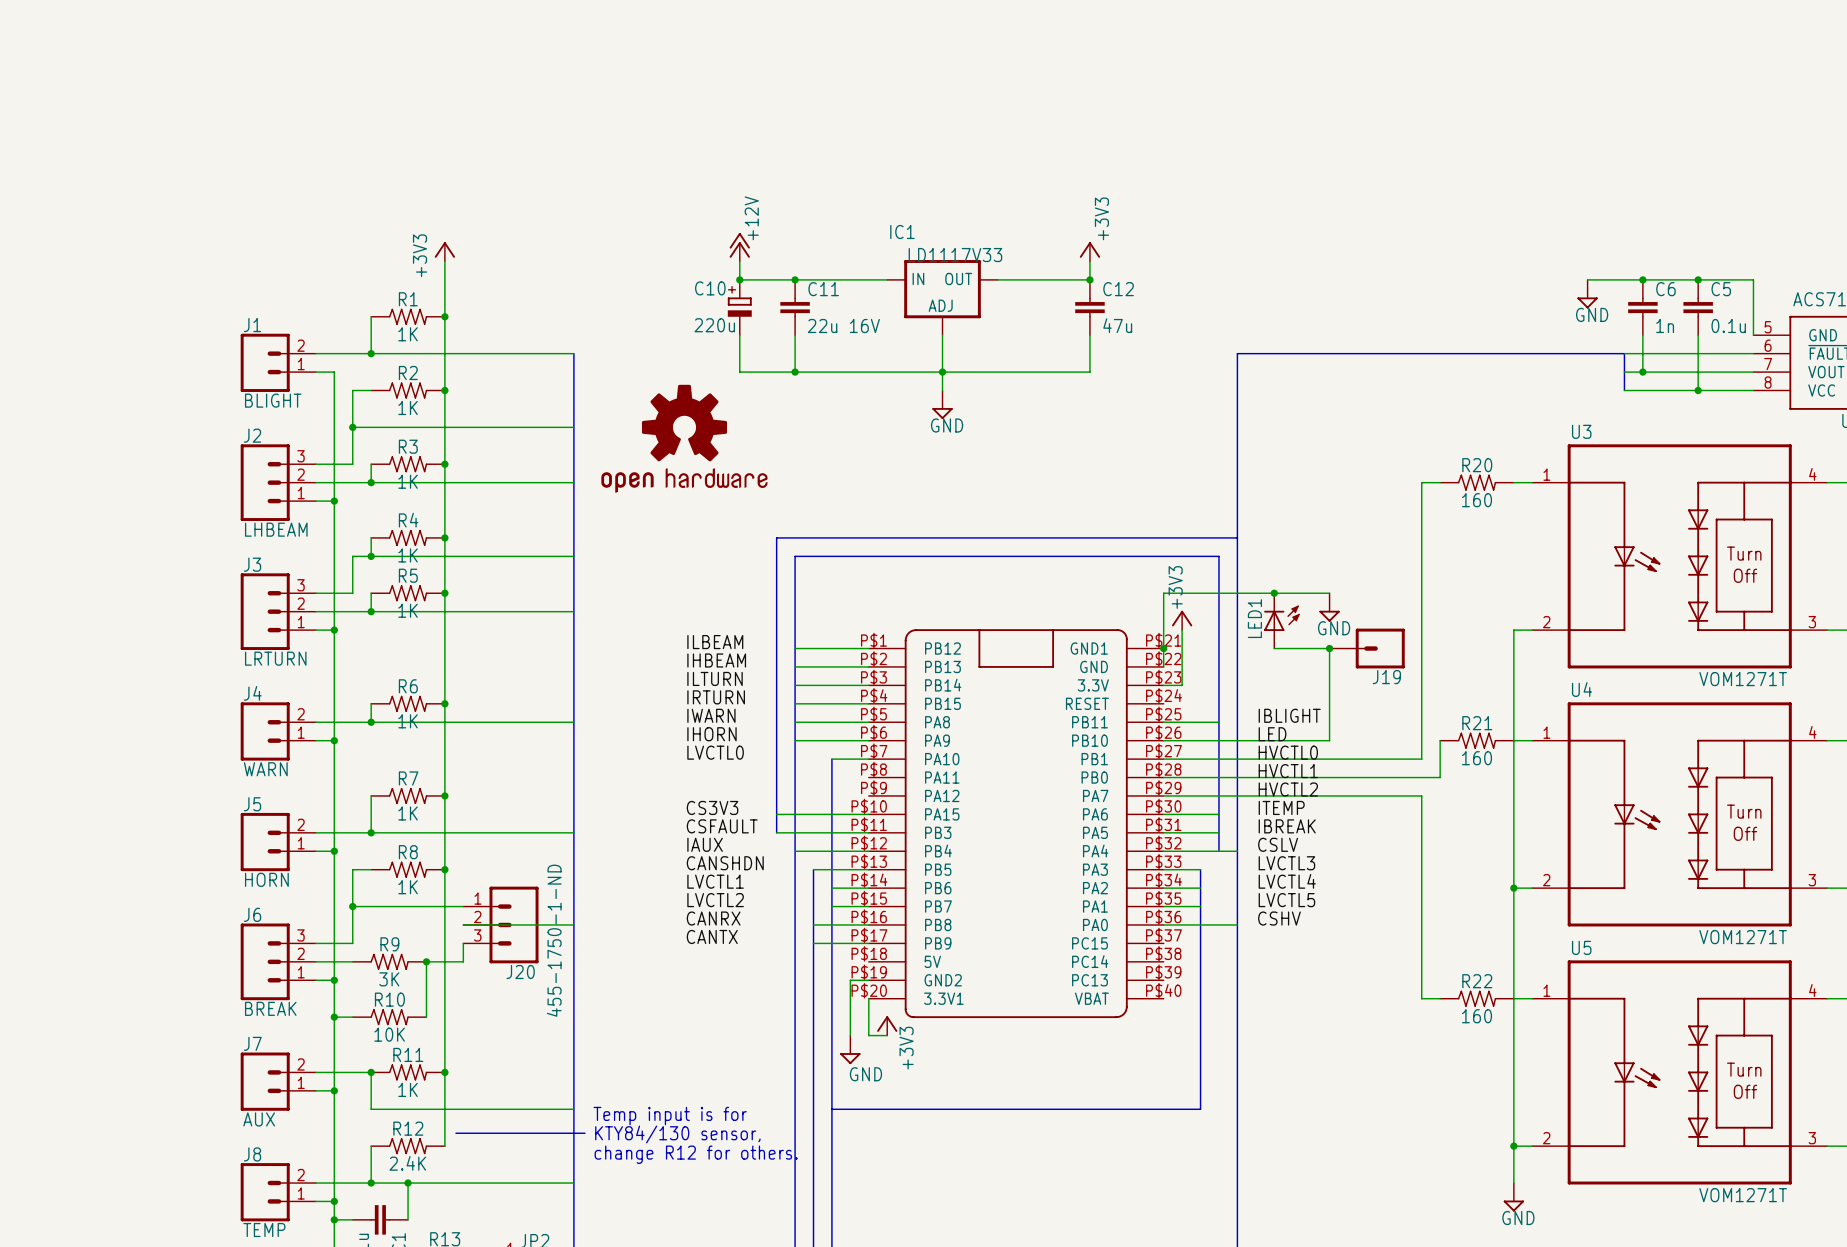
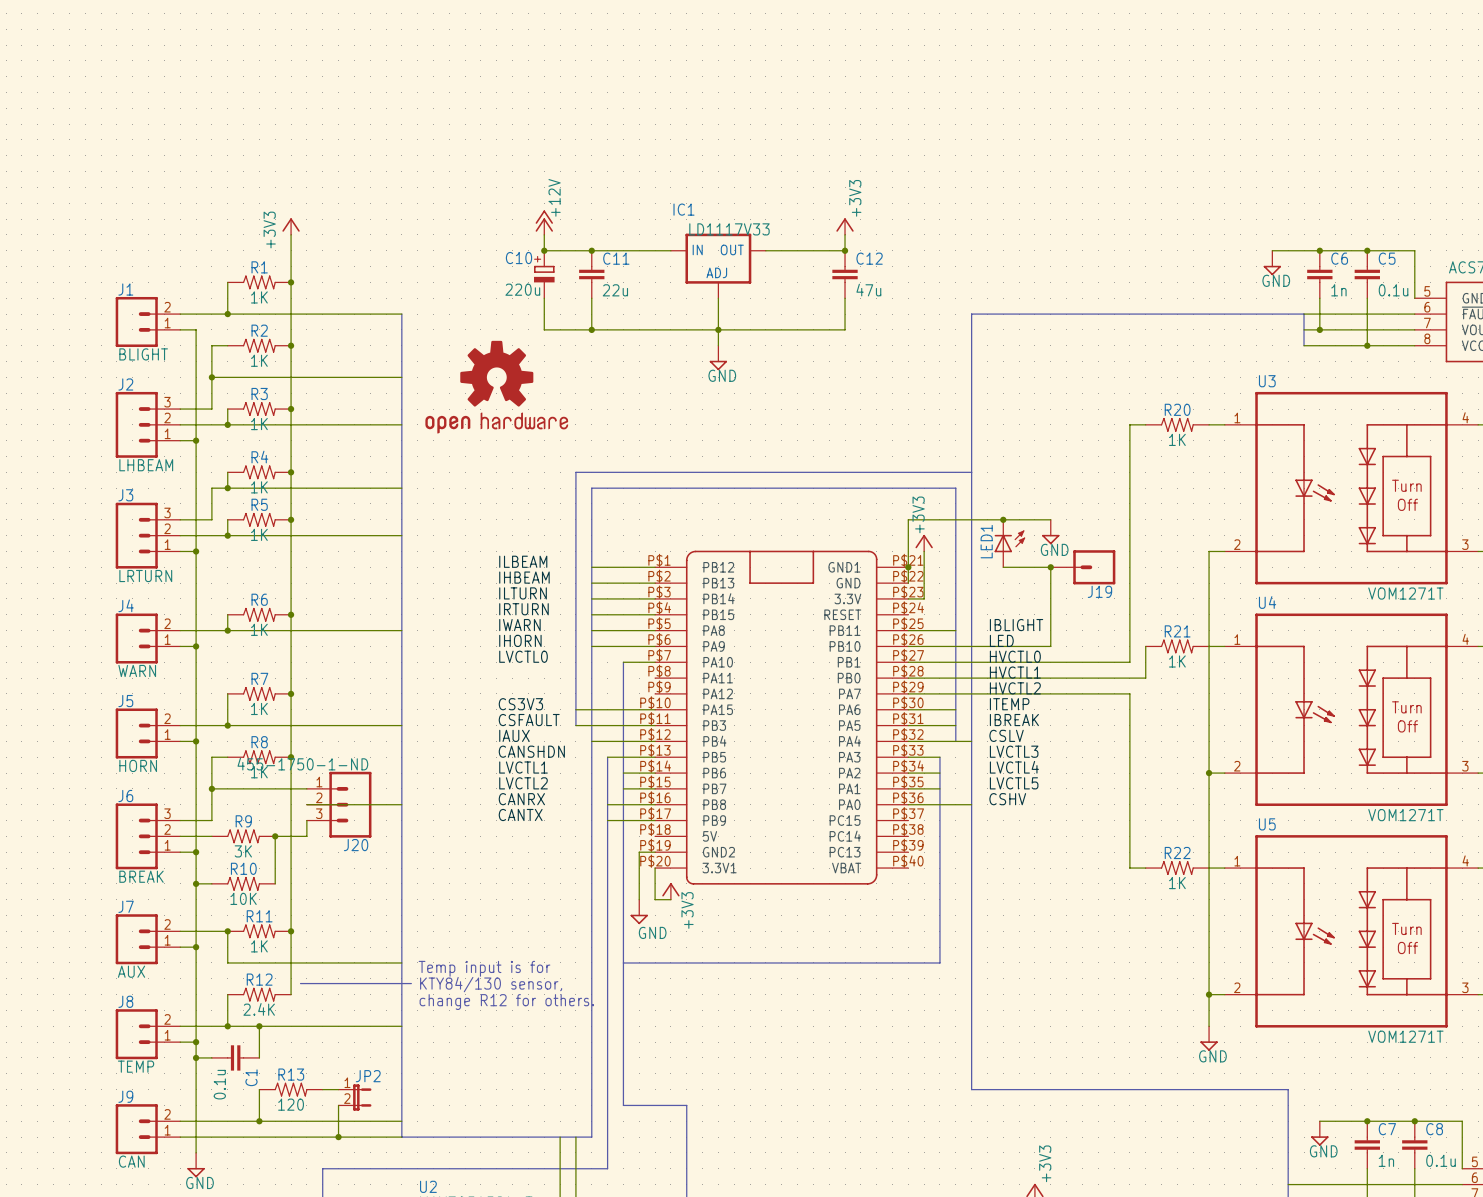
C11 value: 22u 16V (843, 325) -> 22u (615, 290)
R20 value: 160 (1477, 500) -> 1K (1177, 439)
R21 value: 160 (1477, 758) -> 1K (1177, 661)
J20 value rotation: 0° (554, 940) -> 90° clockwise (302, 764)
R22 value: 160 (1477, 1016) -> 1K (1177, 883)

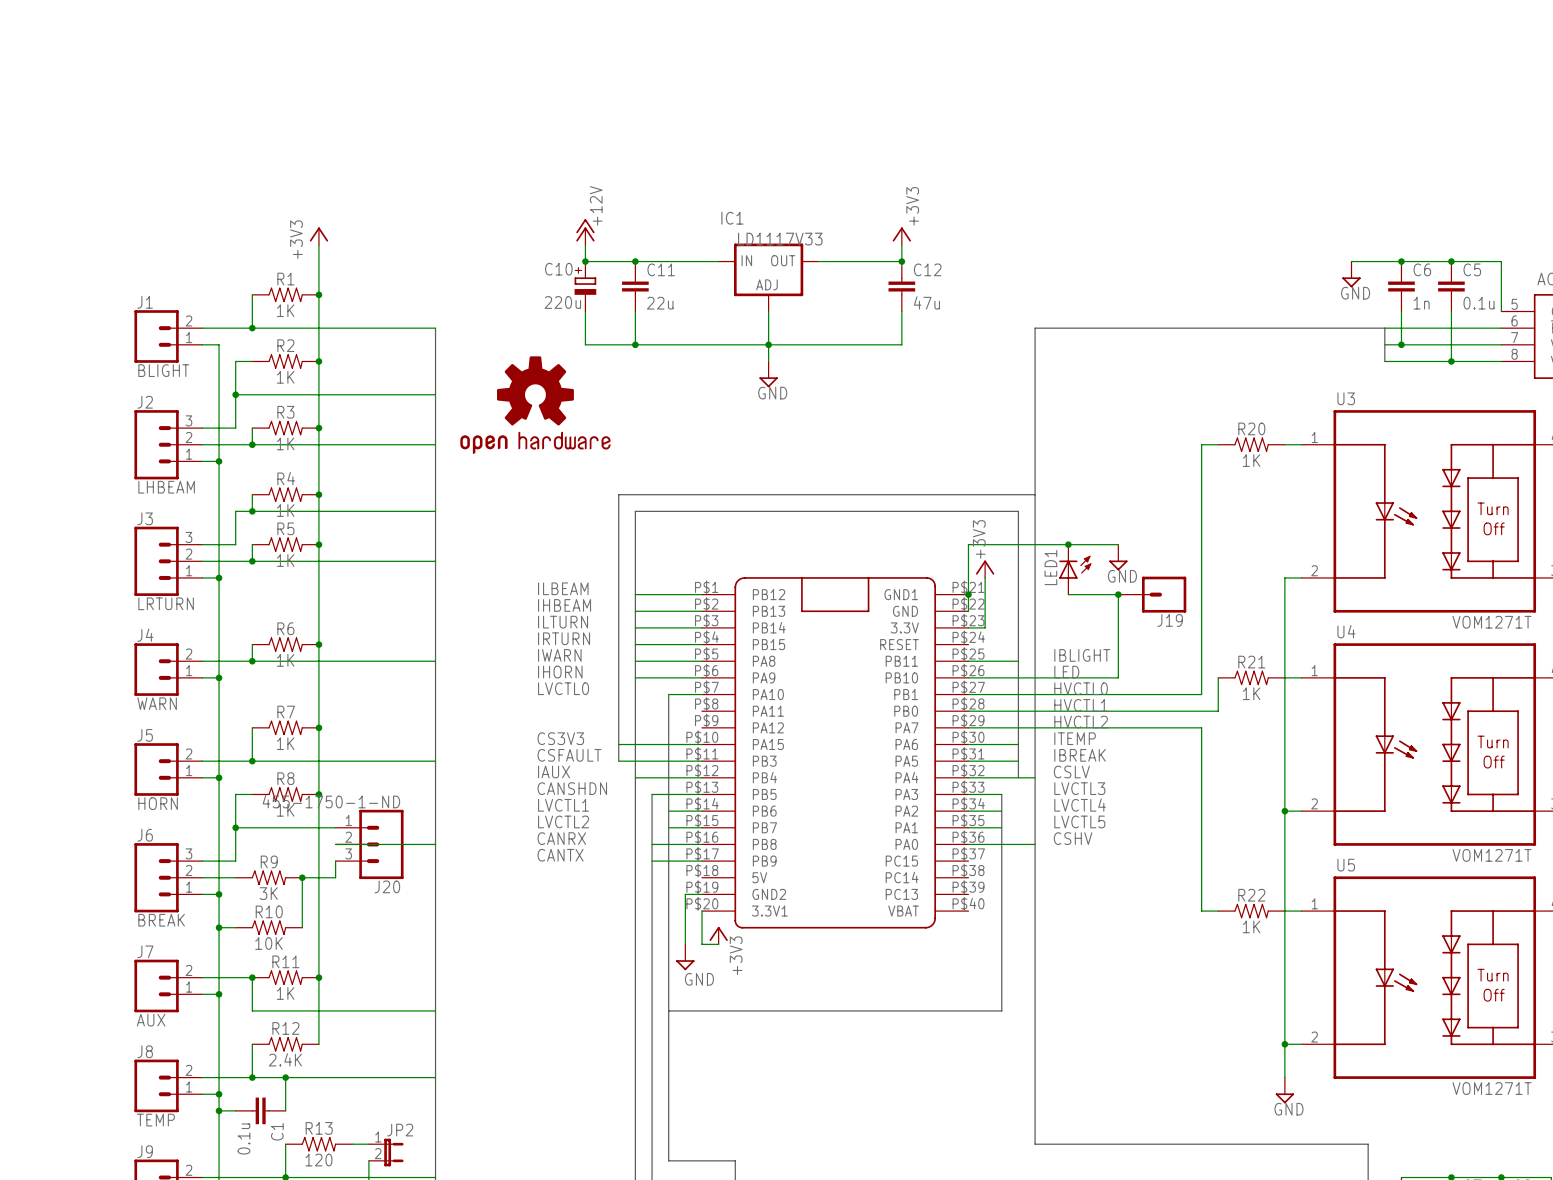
text: Temp input is for (484, 968) -> none
line: (300, 983) (411, 983) -> none
text: KTY84/130 sensor, (491, 984) -> none
text: change R12 for others. (506, 1002) -> none

